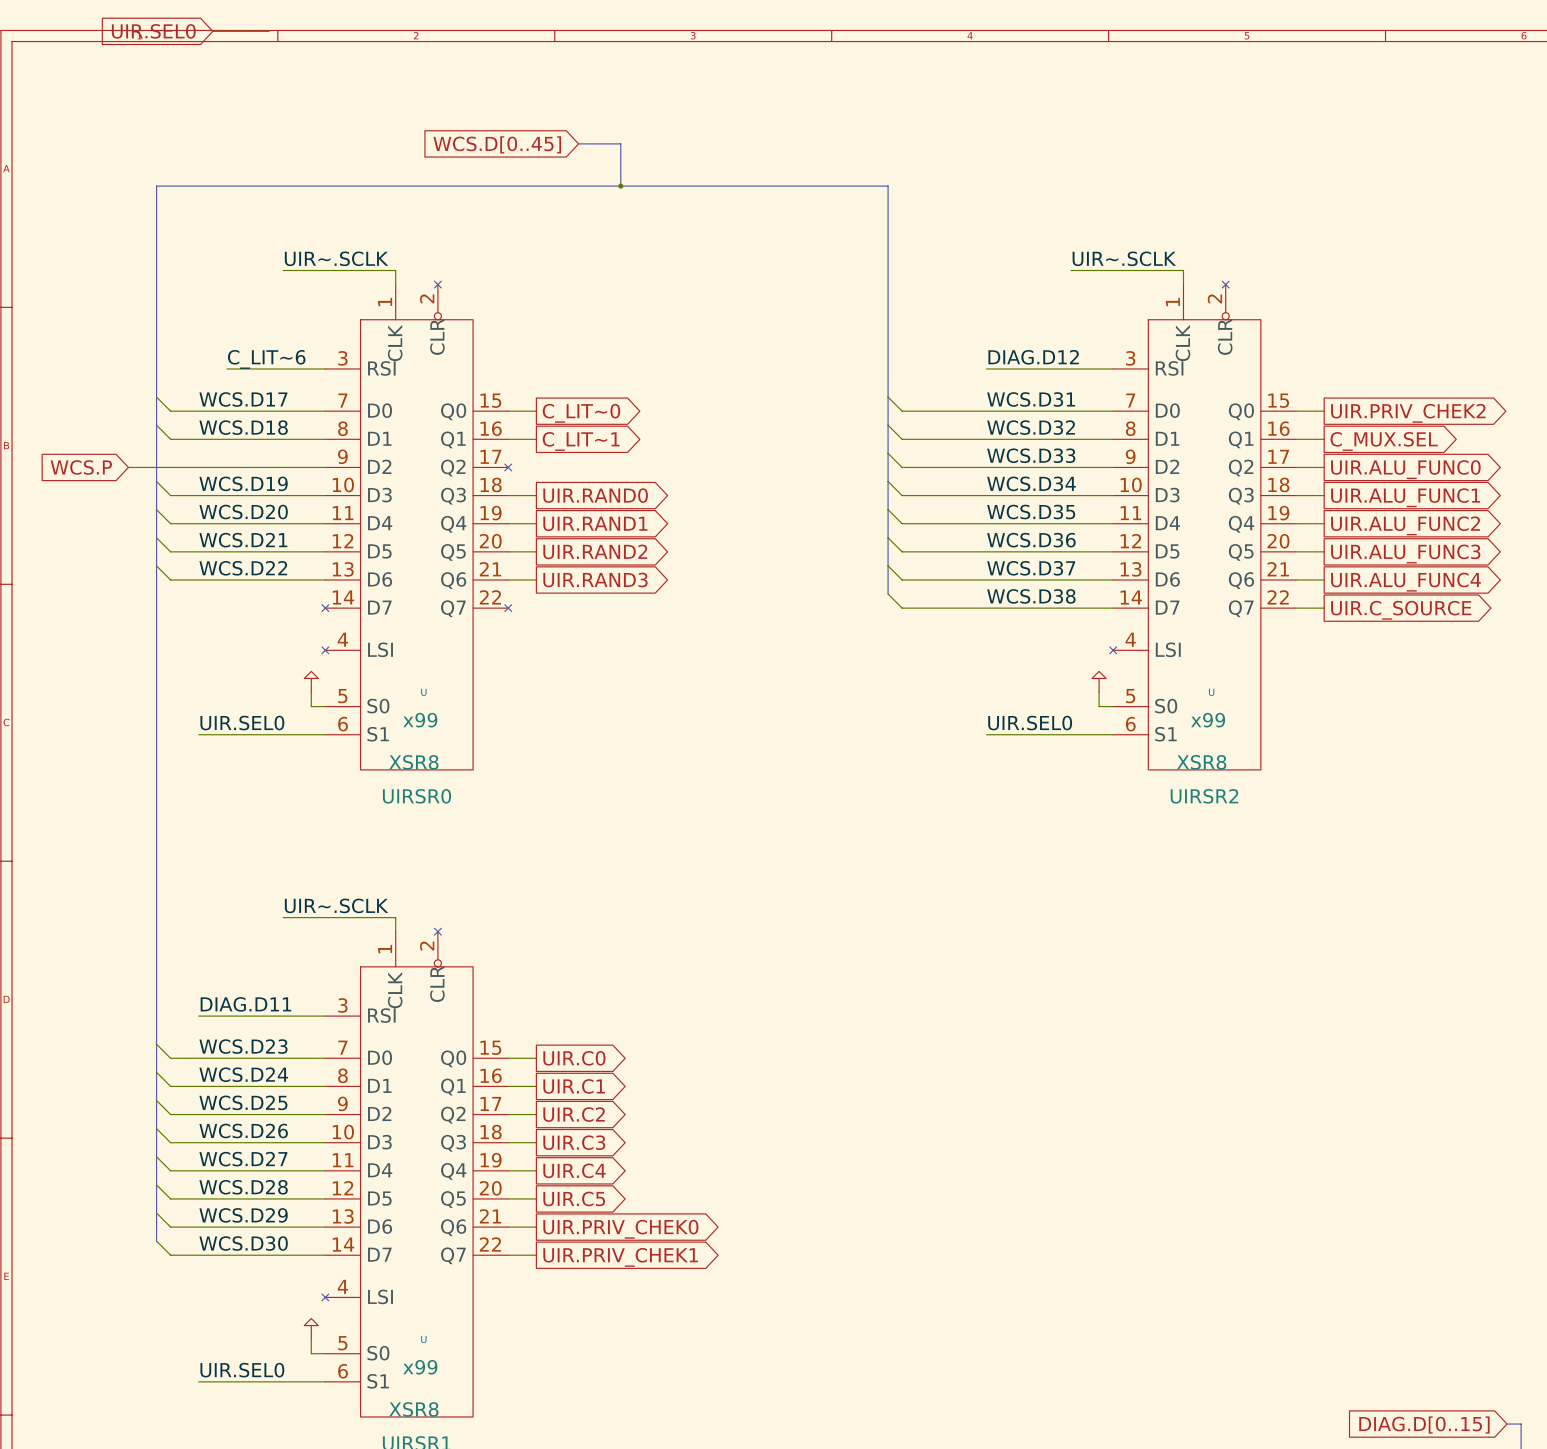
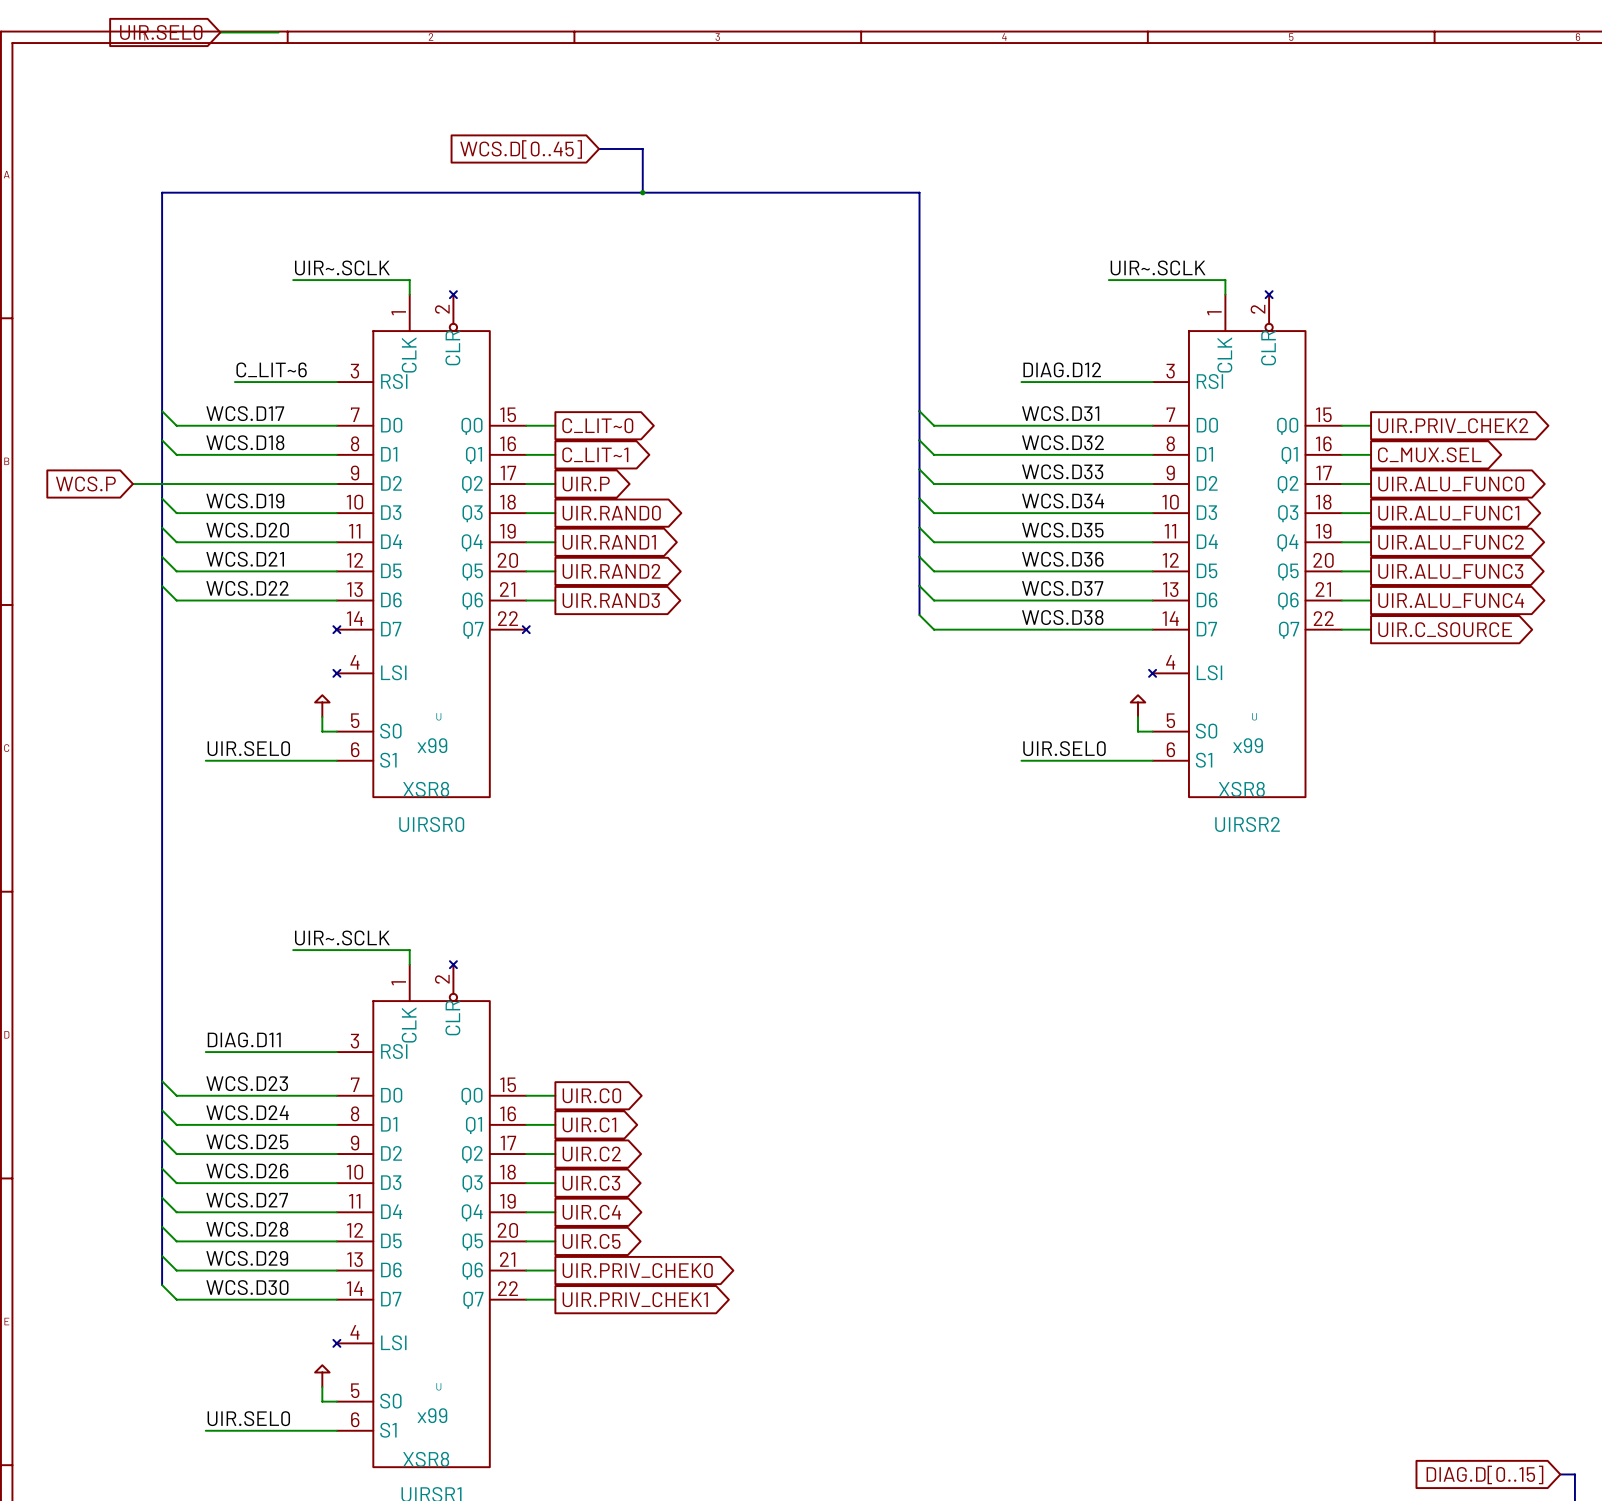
wire: none -> (526, 484) (555, 484)
no-connect mark: (508, 467) -> none
global label: none -> UIR.P (586, 484)

